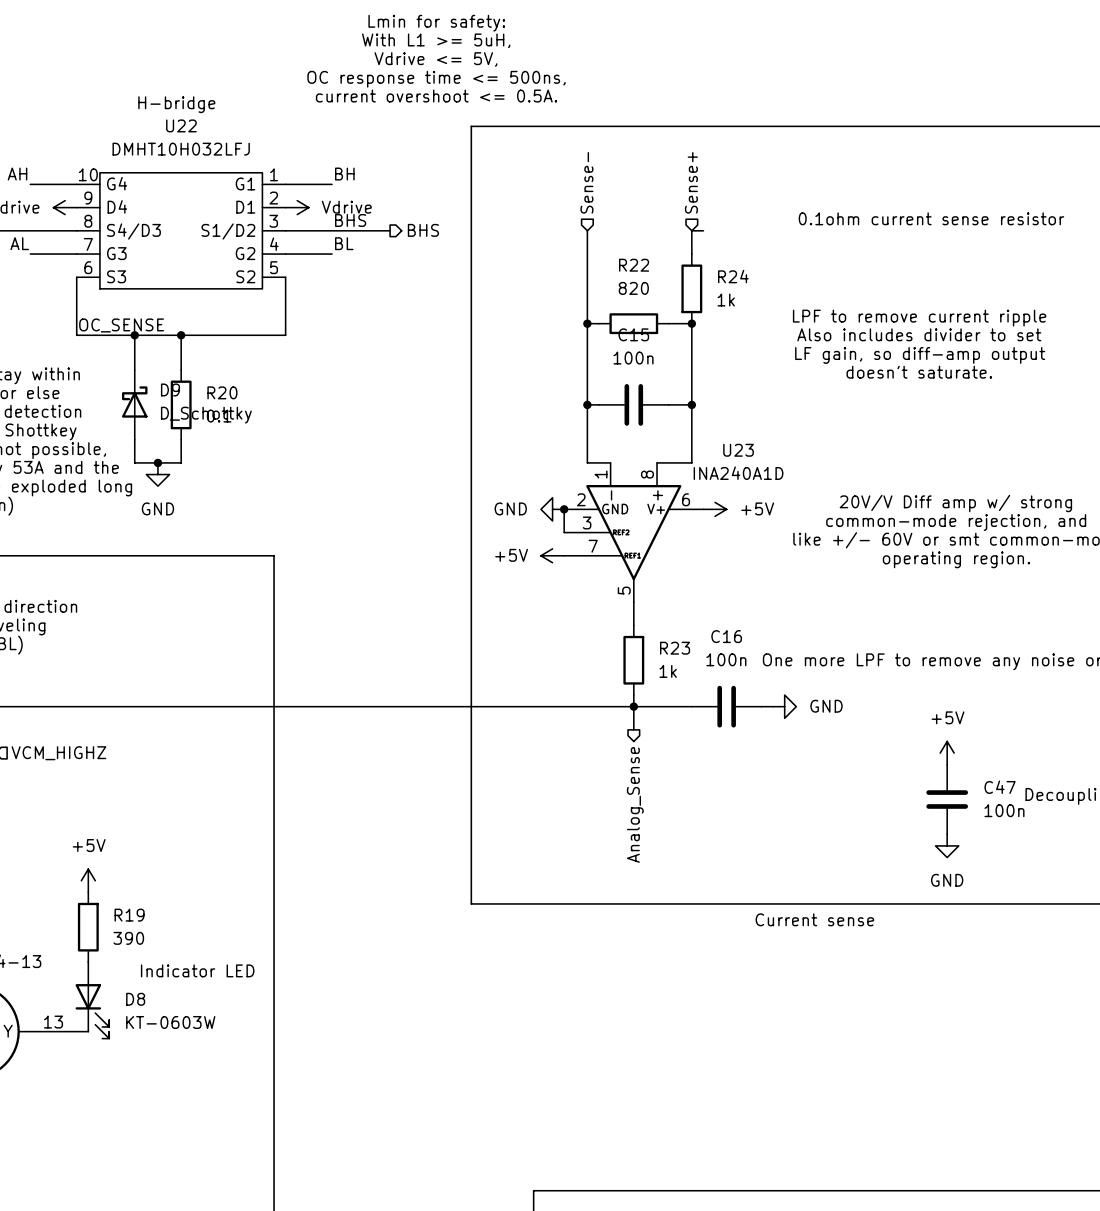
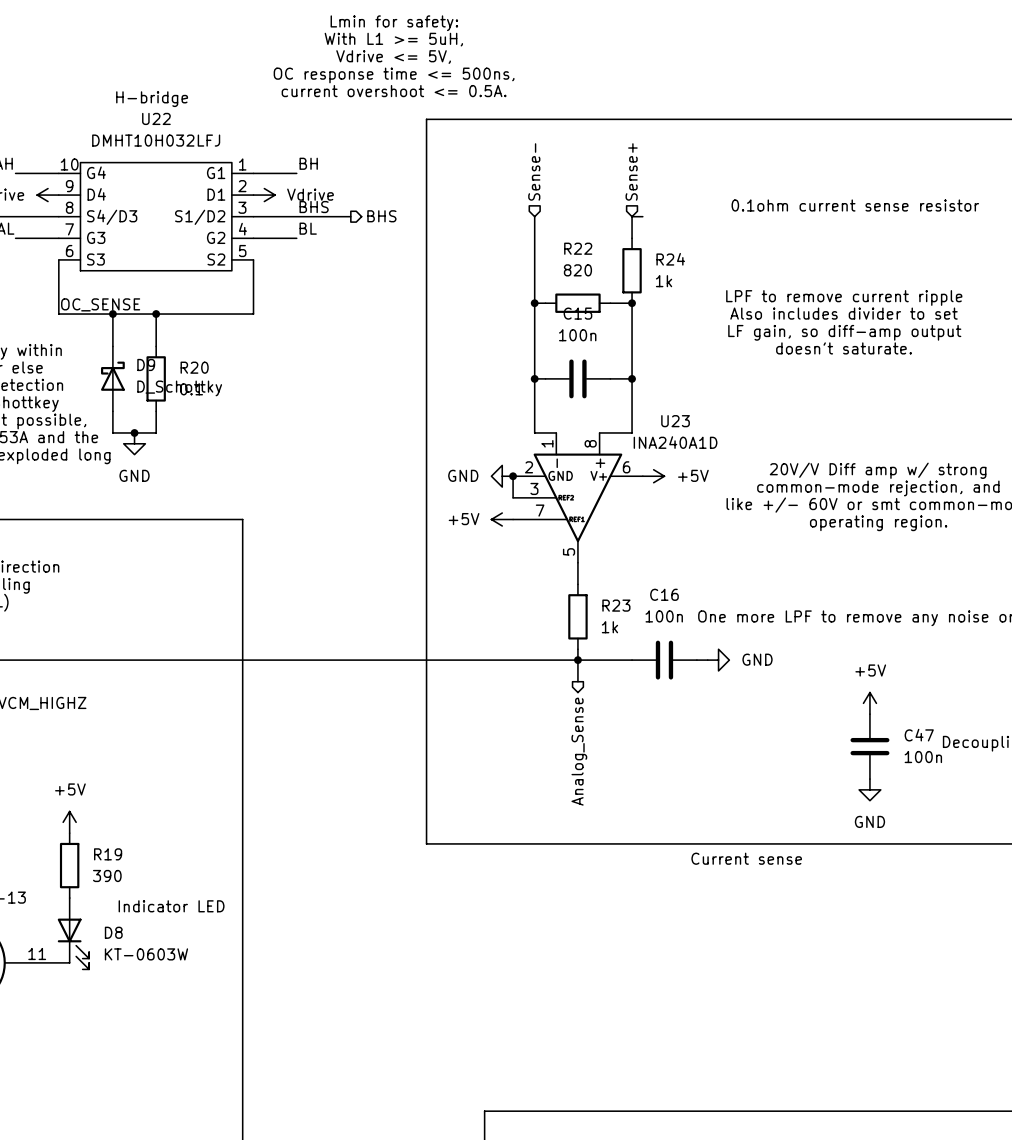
part pin number: 13 (53, 1022) -> 11 (37, 953)

